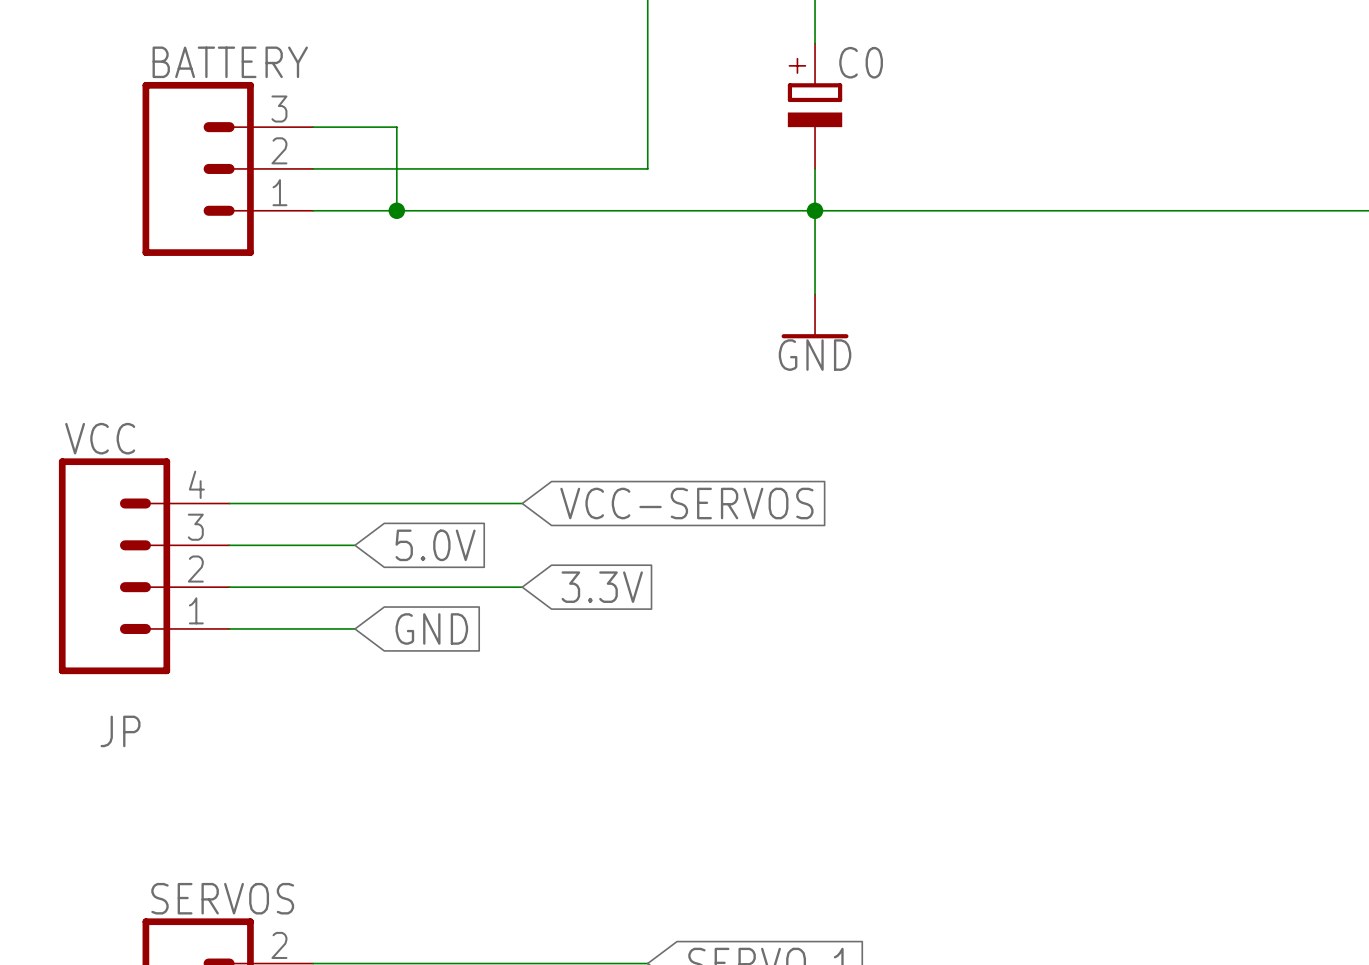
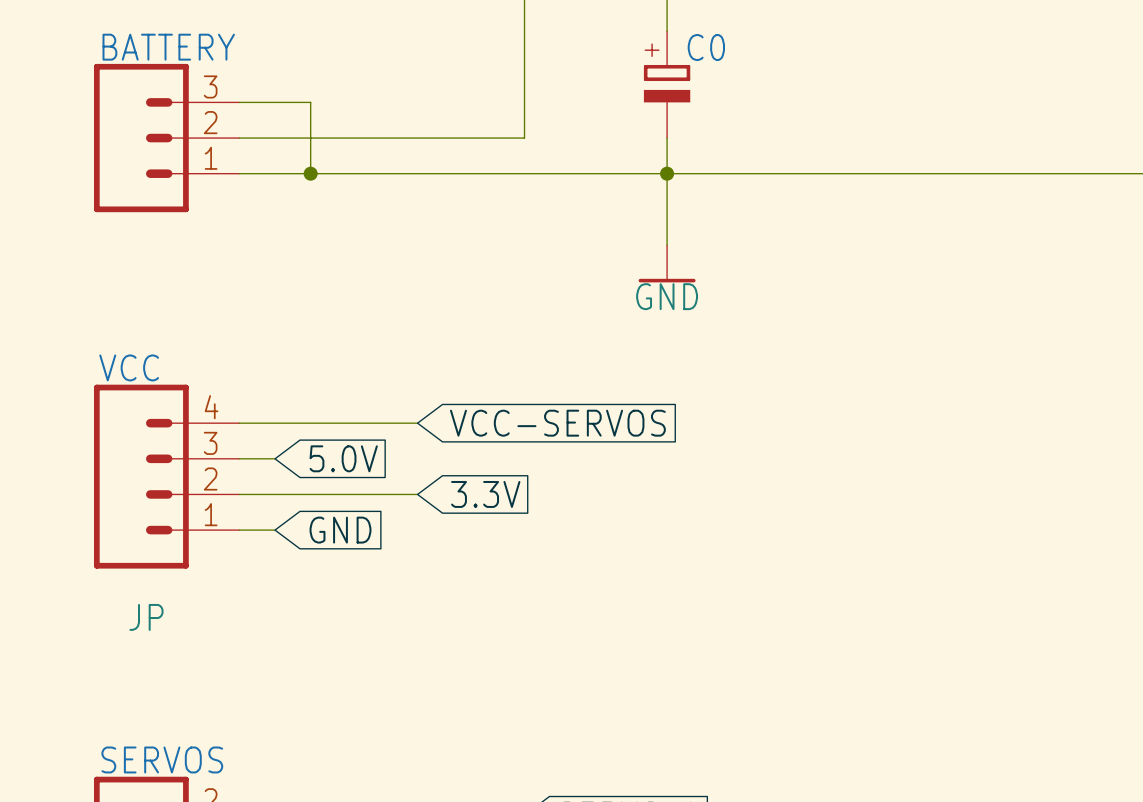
VCC position: (144, 566) -> (166, 476)

